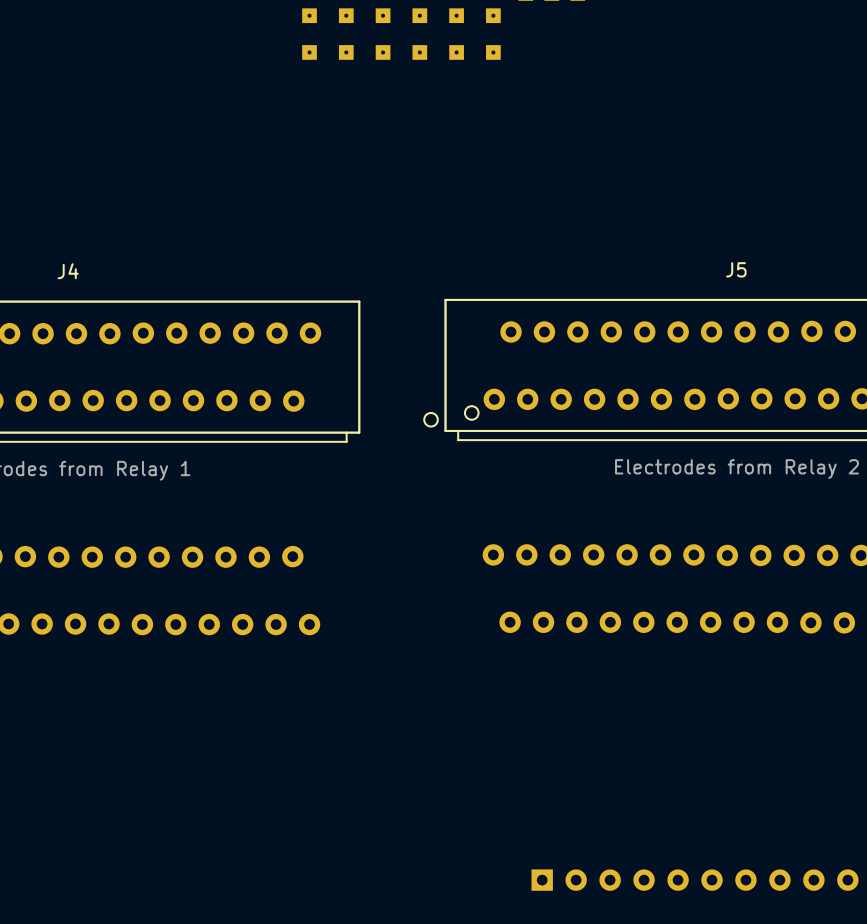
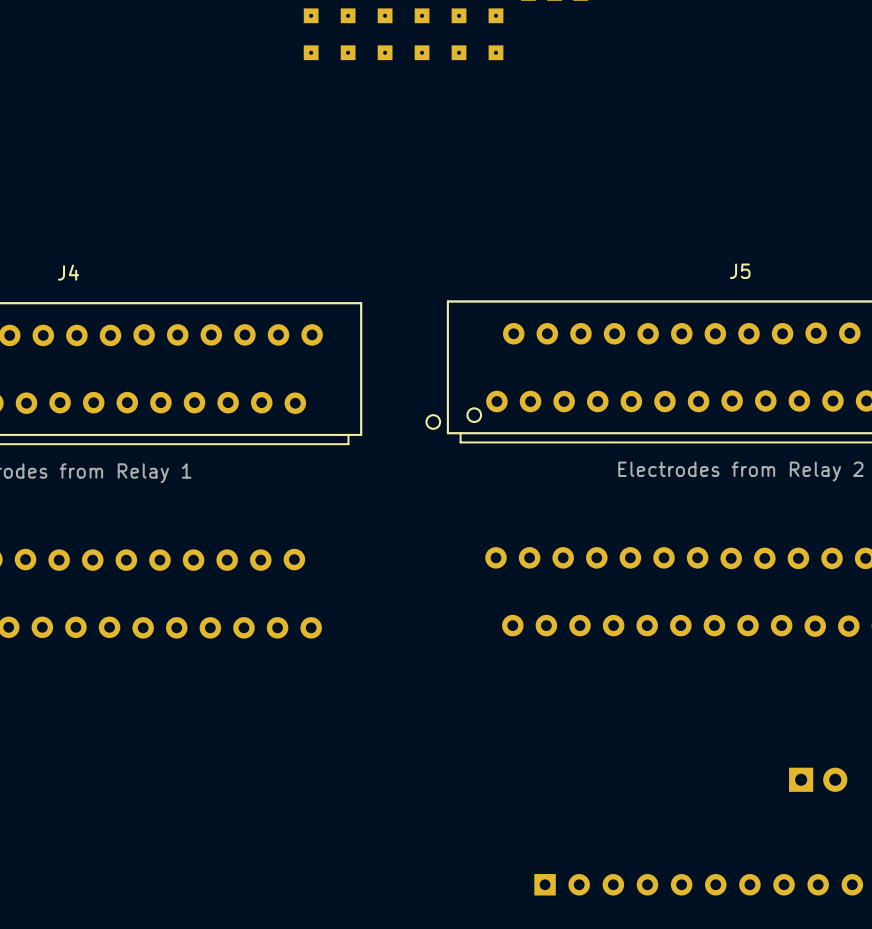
part: none -> (818, 779)

